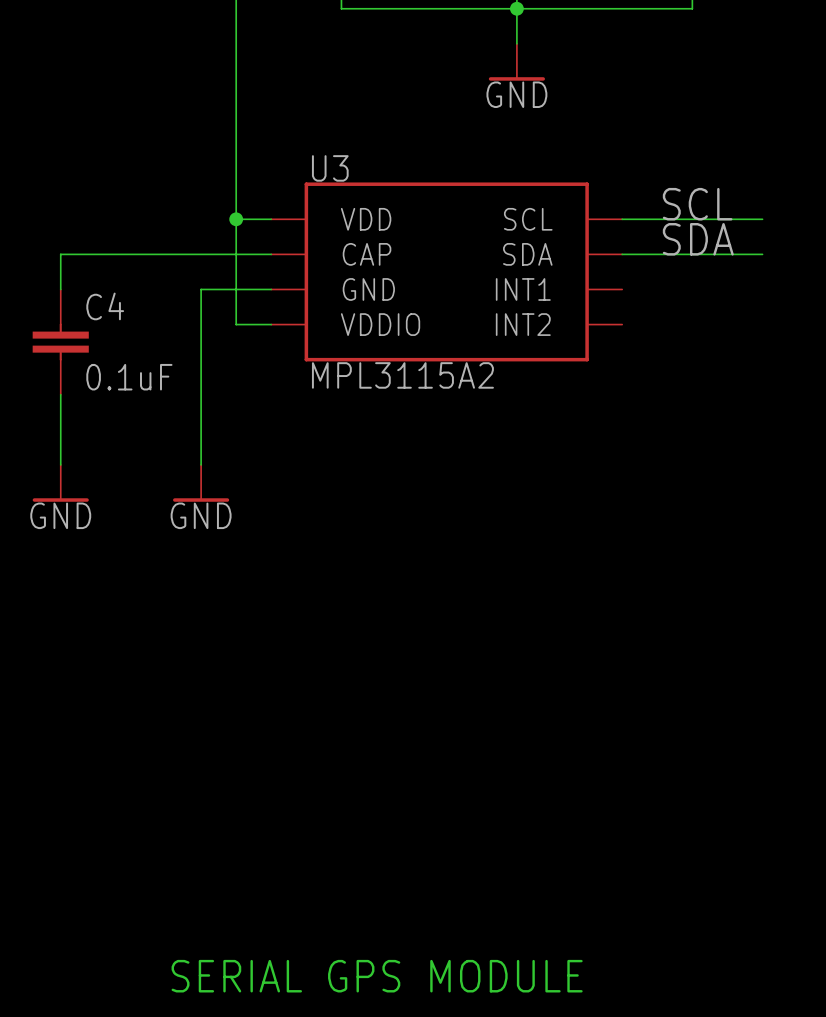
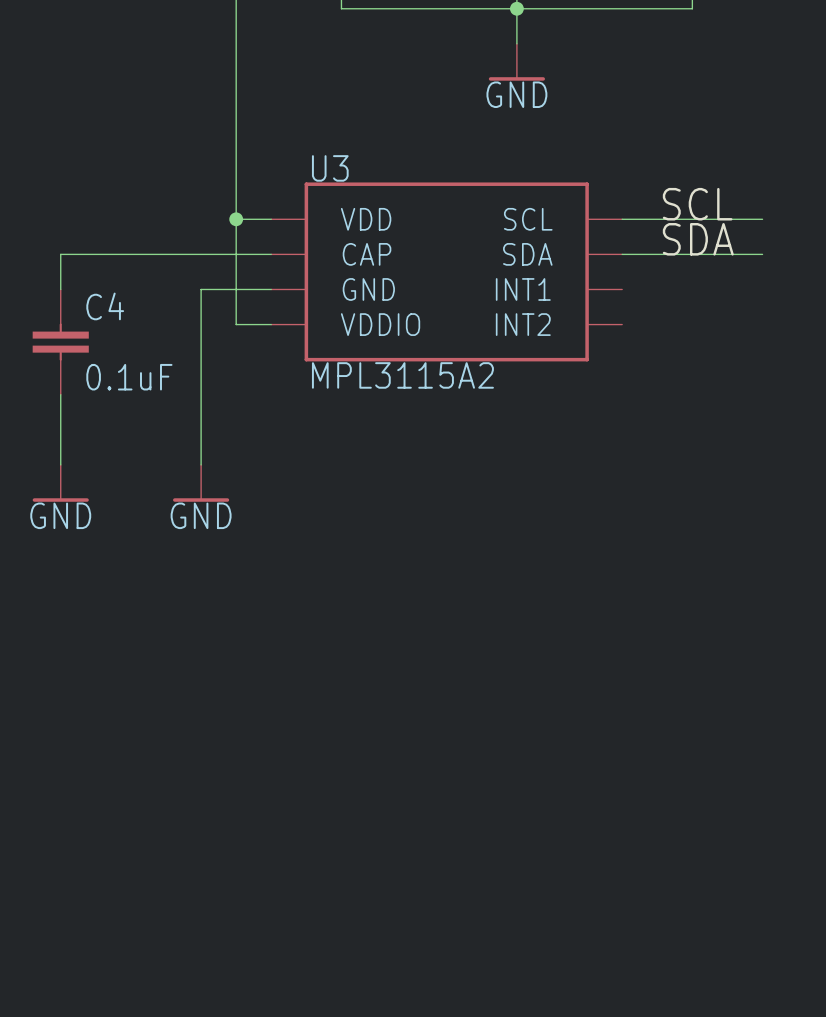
text: SERIAL GPS MODULE (377, 976) -> none

